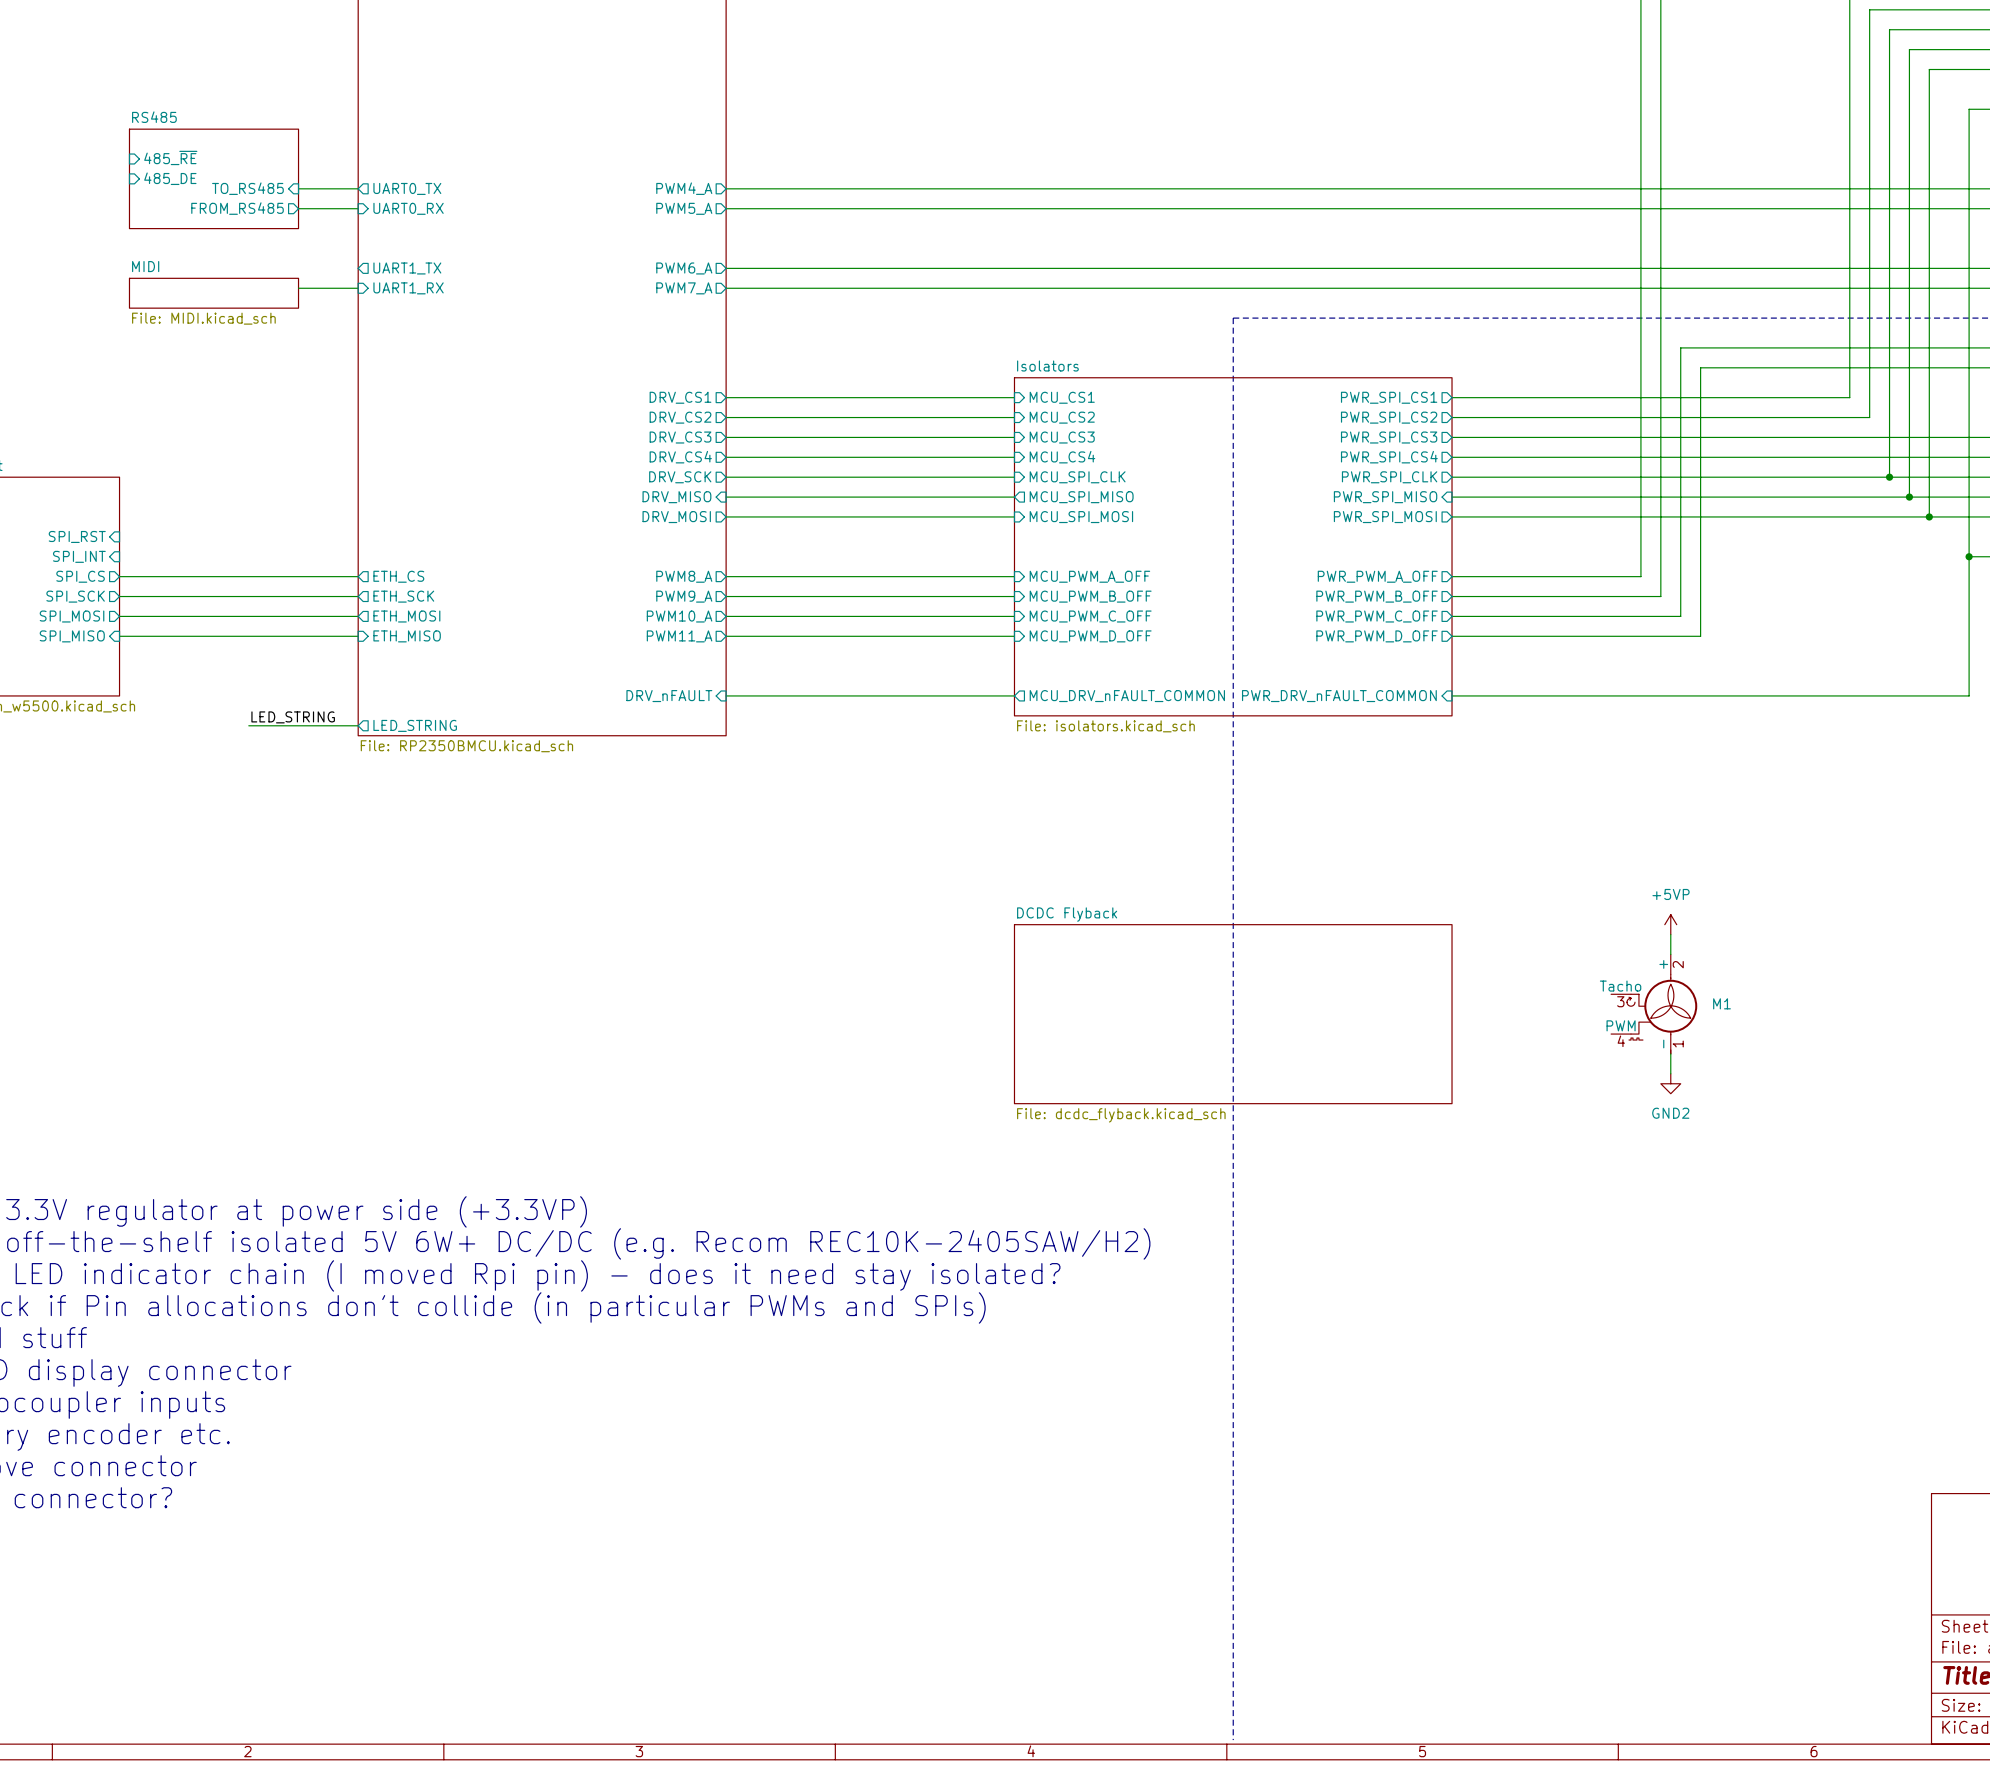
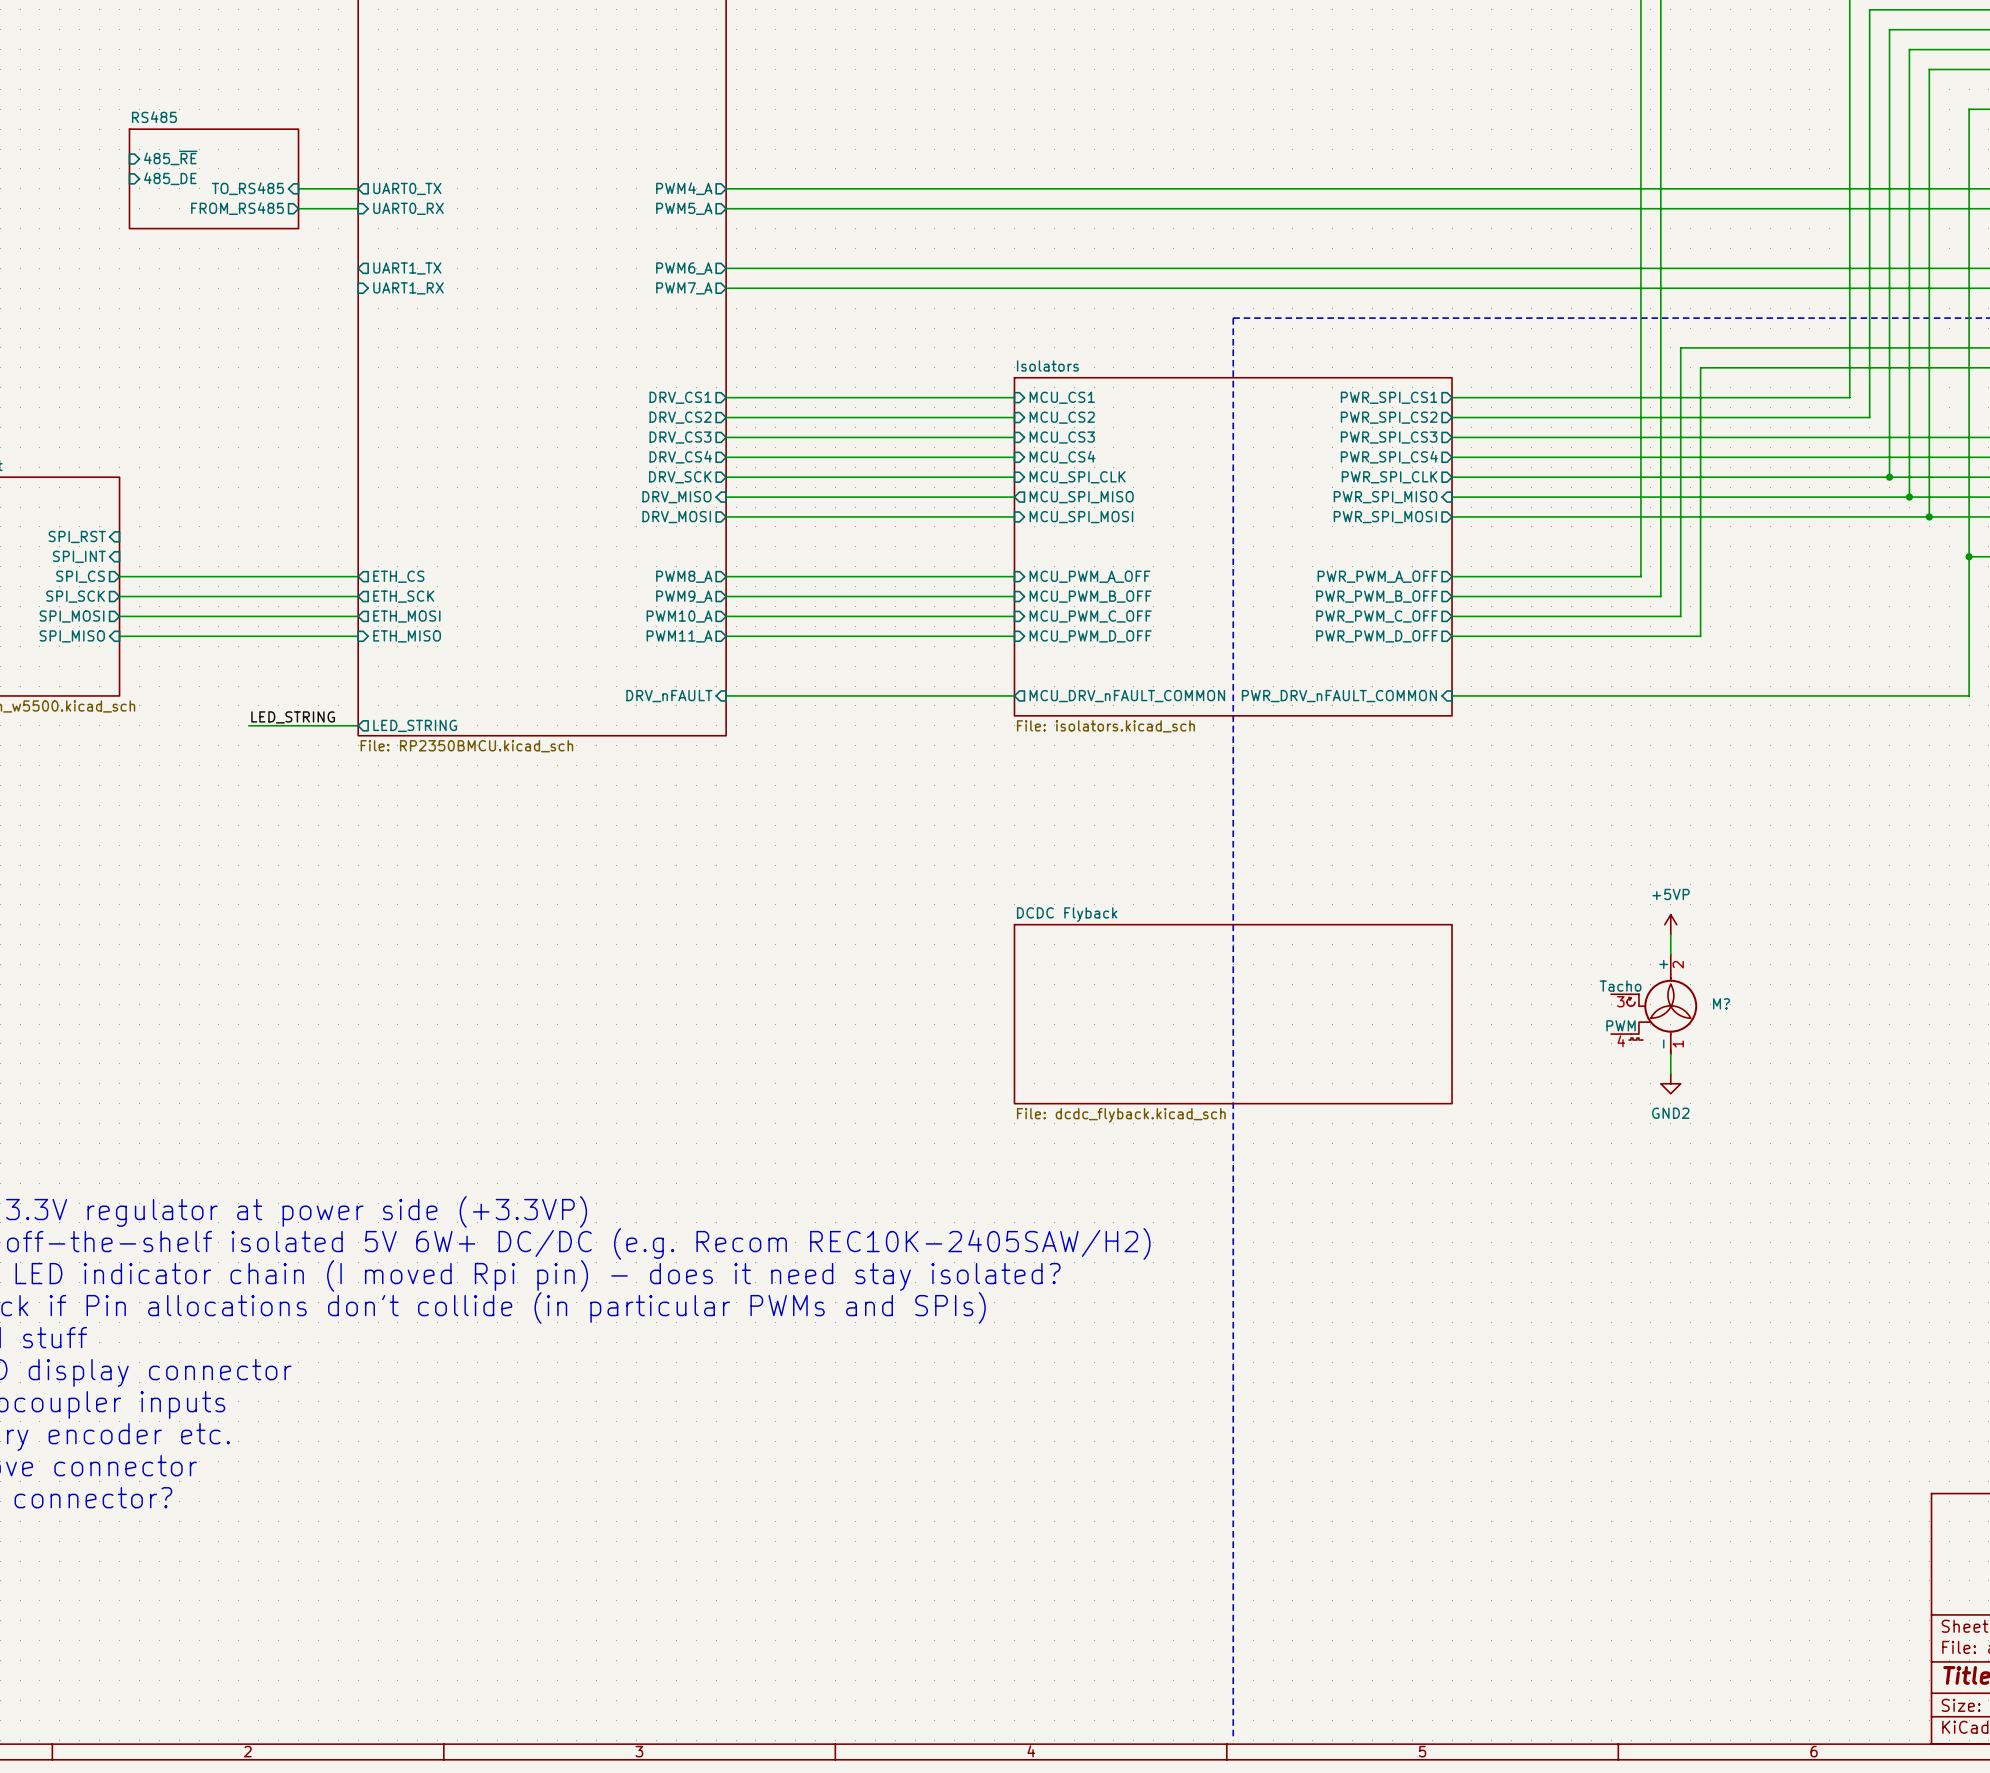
wire: (298, 288) (358, 288) -> none
sheet MIDI: File: MIDI.kicad_sch (214, 293) -> none
M1 name: M1 (1721, 1003) -> M? (1721, 1003)

